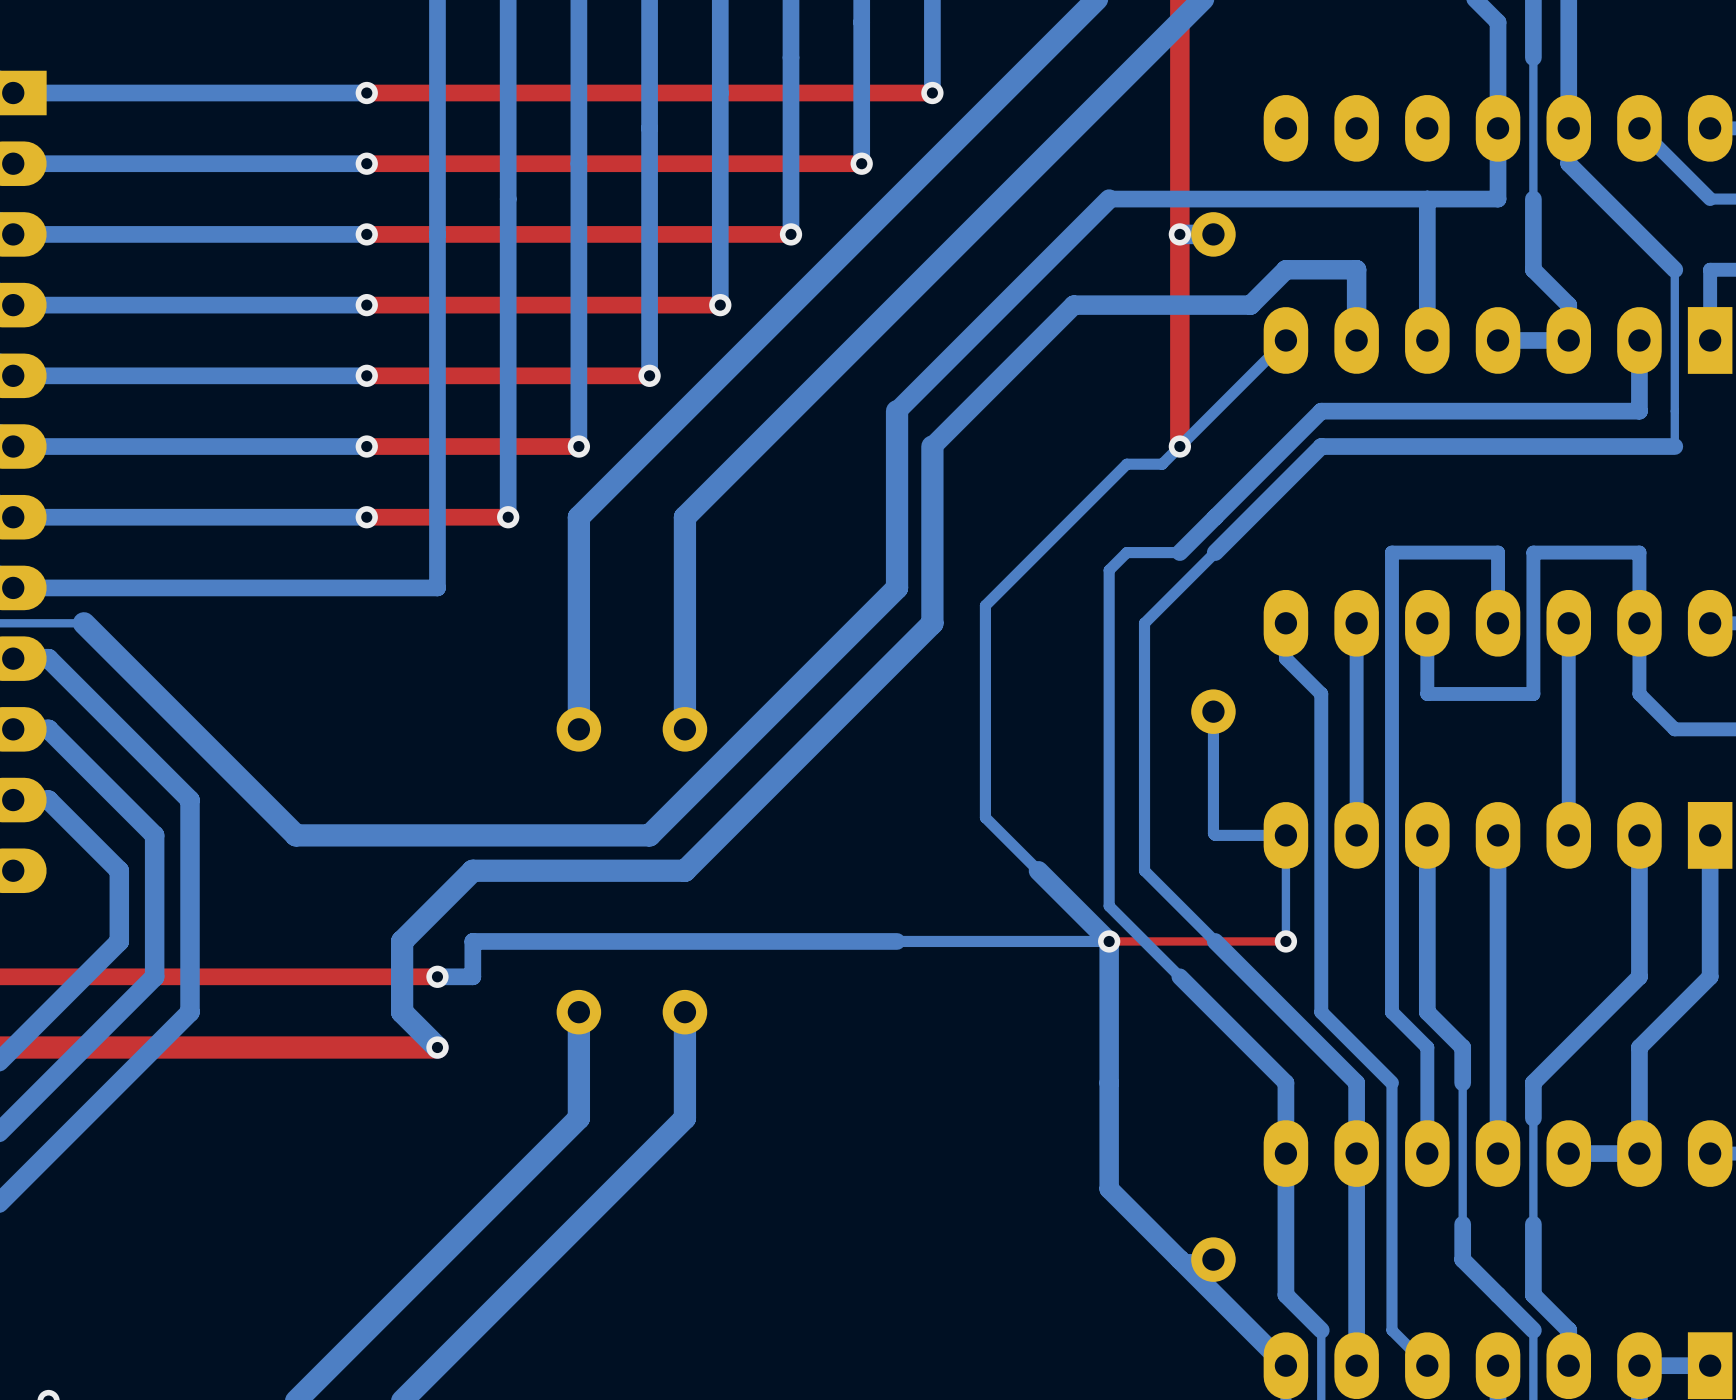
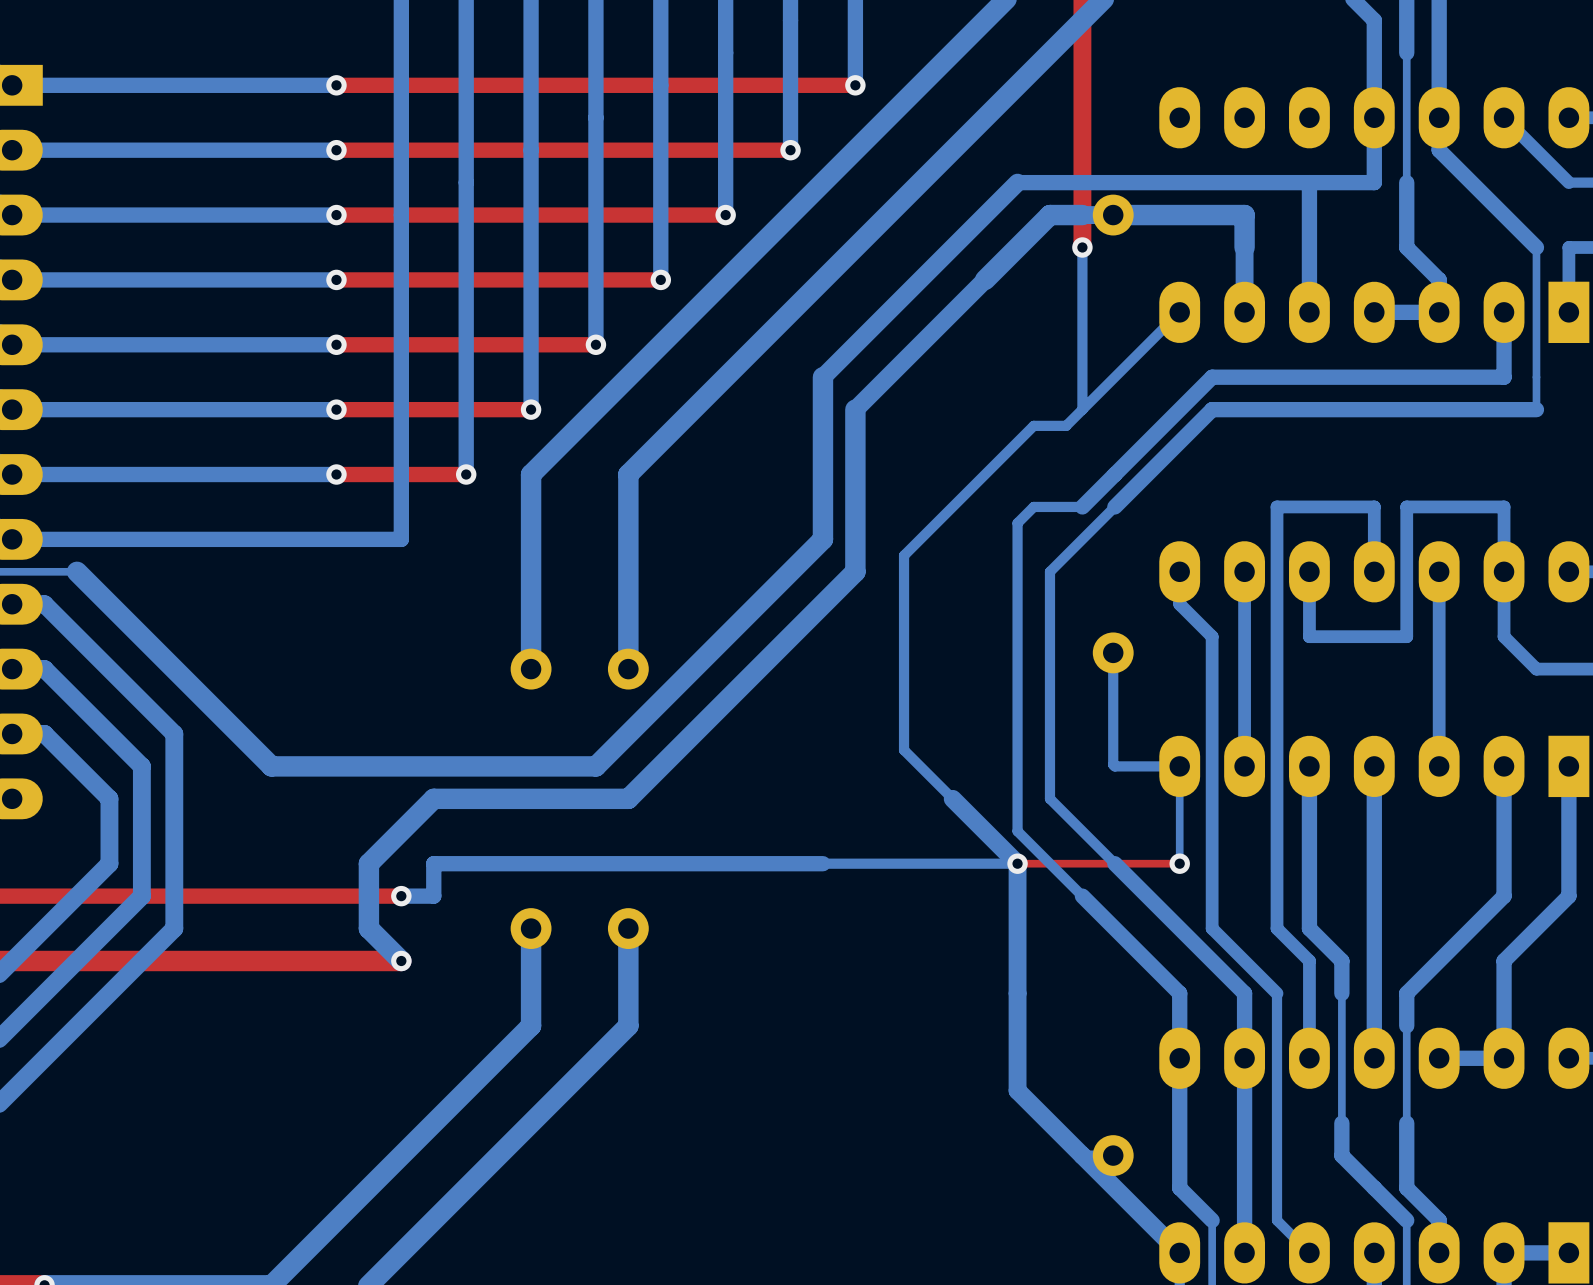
bottom track: none -> (1082, 215) (1049, 215) (985, 279)
via position: (1179, 234) -> (1082, 247)
bottom track: none -> (1082, 247) (1082, 409)
top track: (1179, 269) (1179, 446) -> none
bottom track: (1356, 269) (1285, 269) (1250, 305) (1073, 305) -> (1244, 247) (1244, 215) (1113, 215)
via: (1179, 446) -> none

